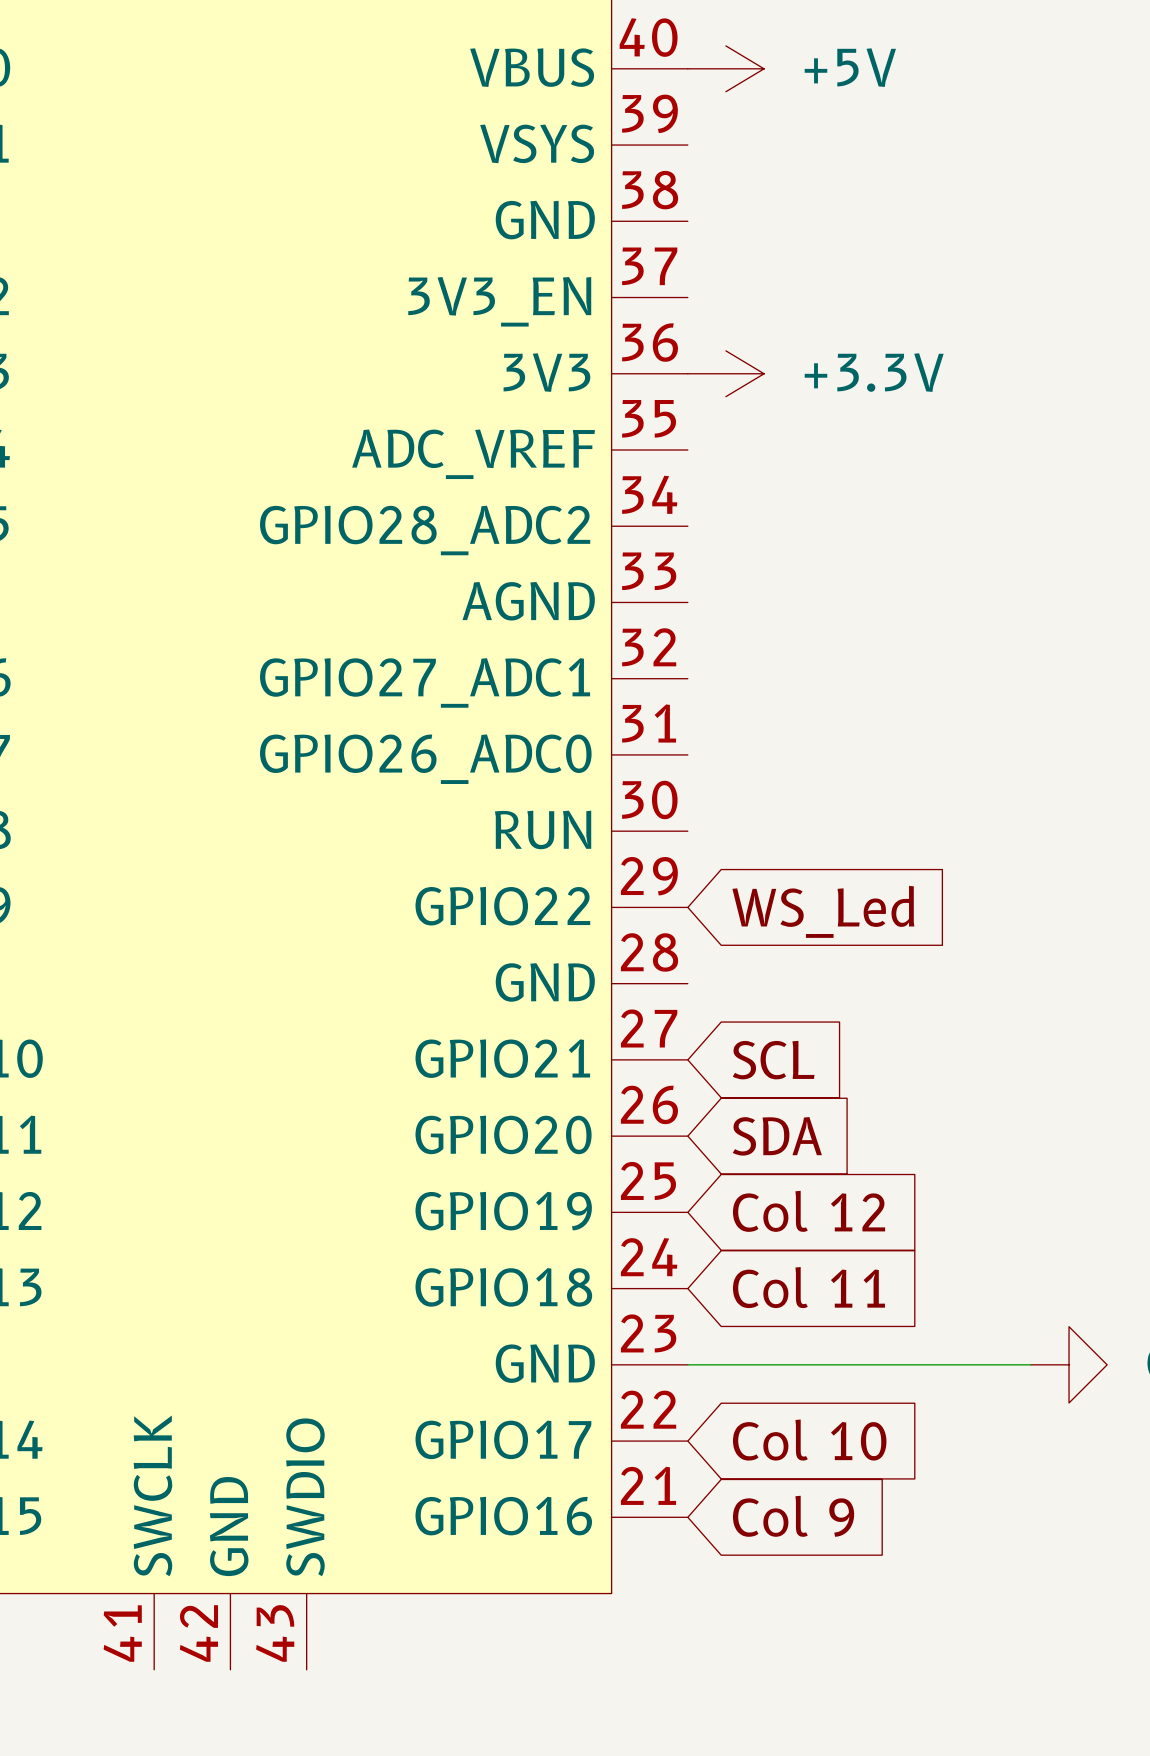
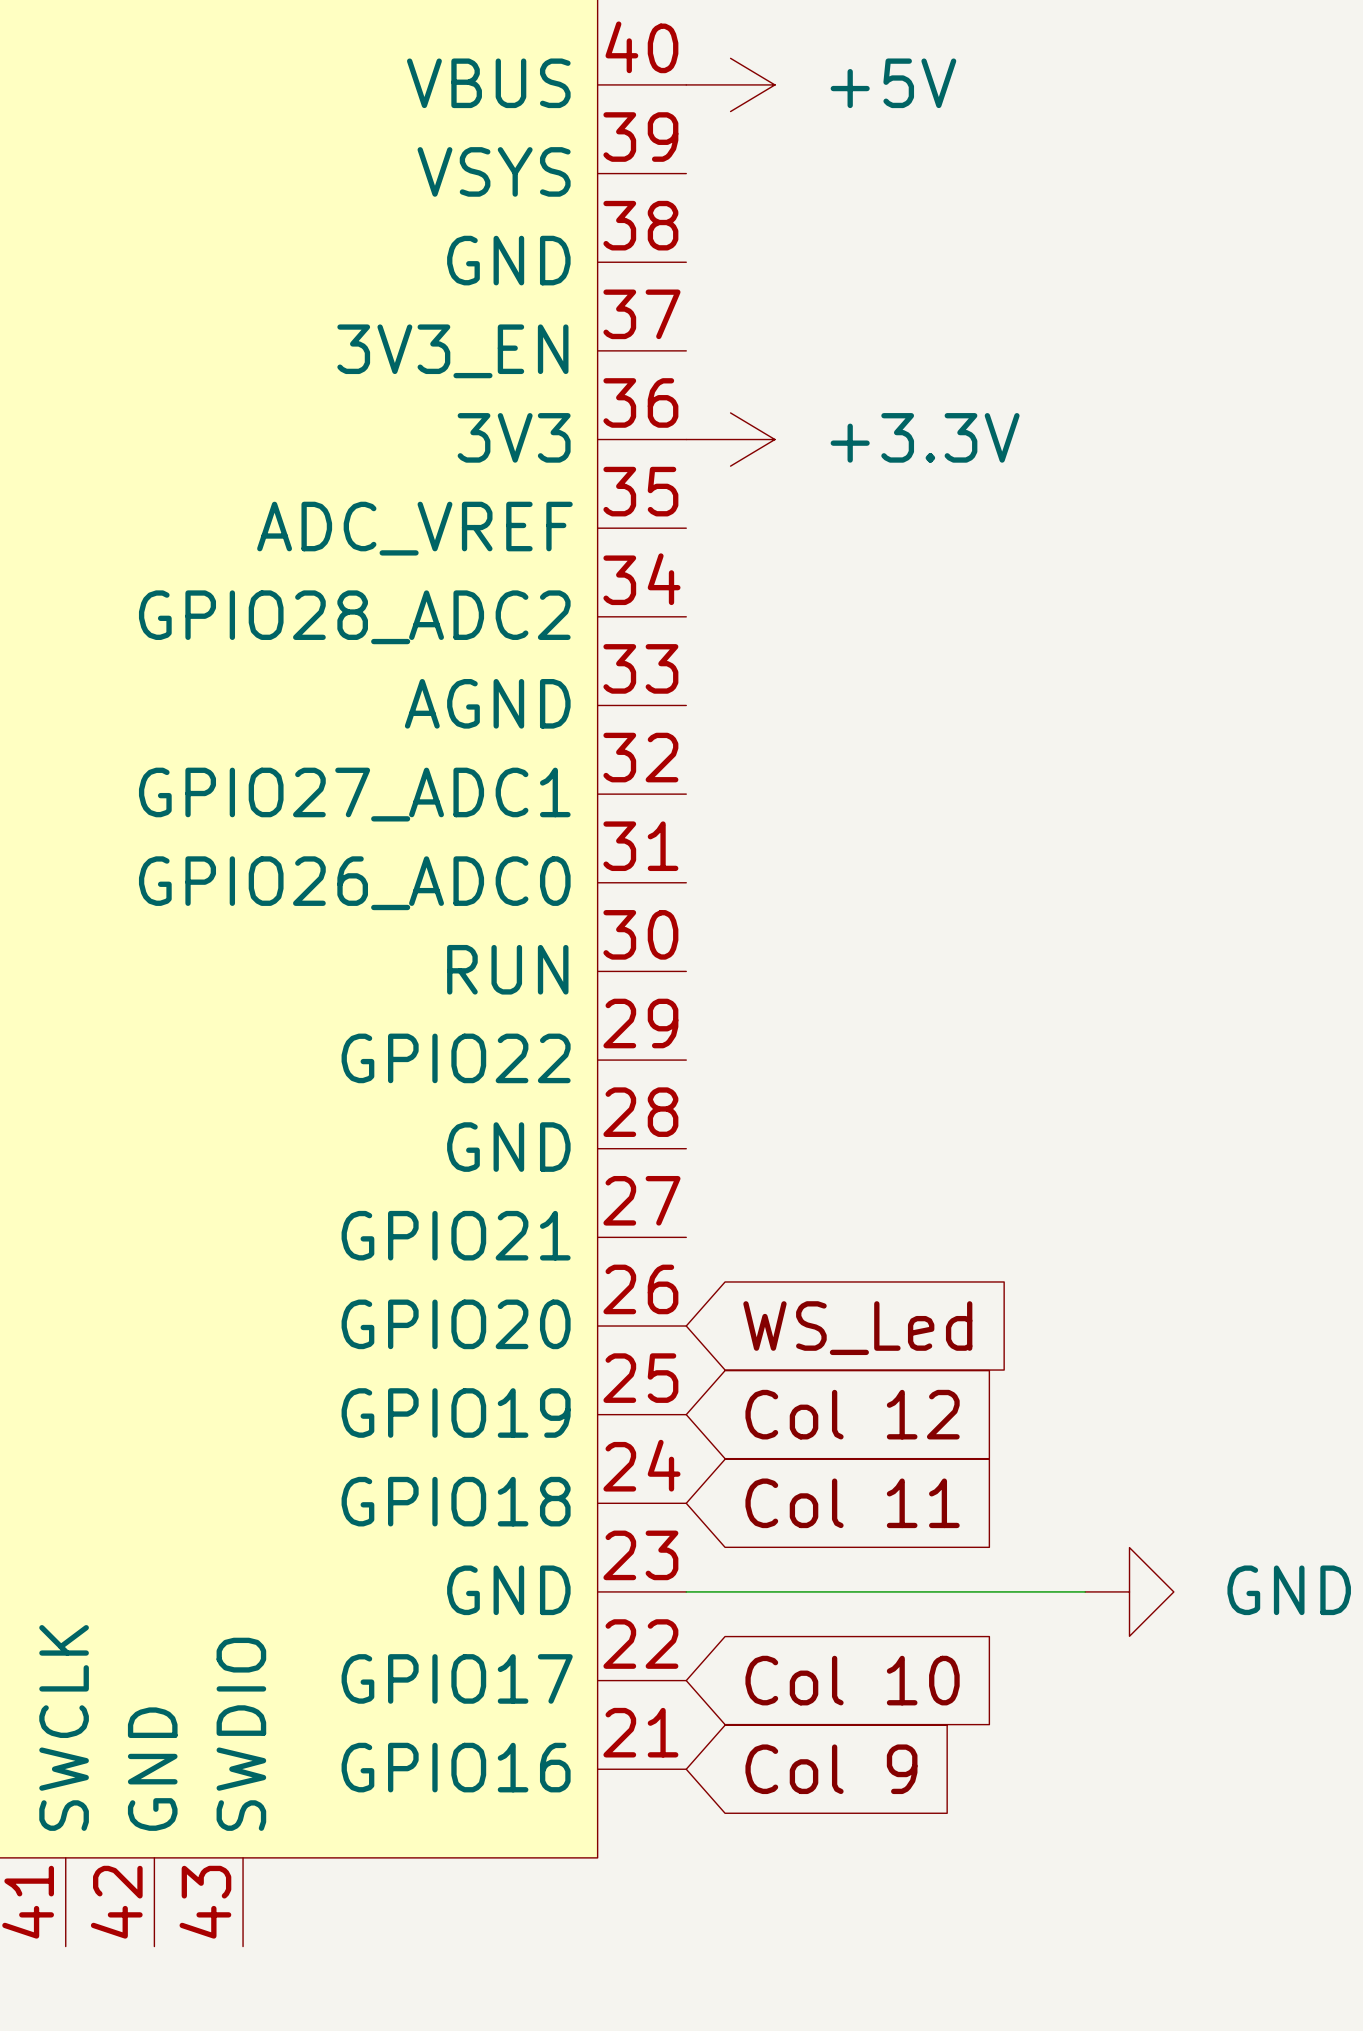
global label: WS_Led (823, 911) -> none
global label: SCL (773, 1060) -> none
global label: SDA (777, 1136) -> WS_Led (857, 1328)

